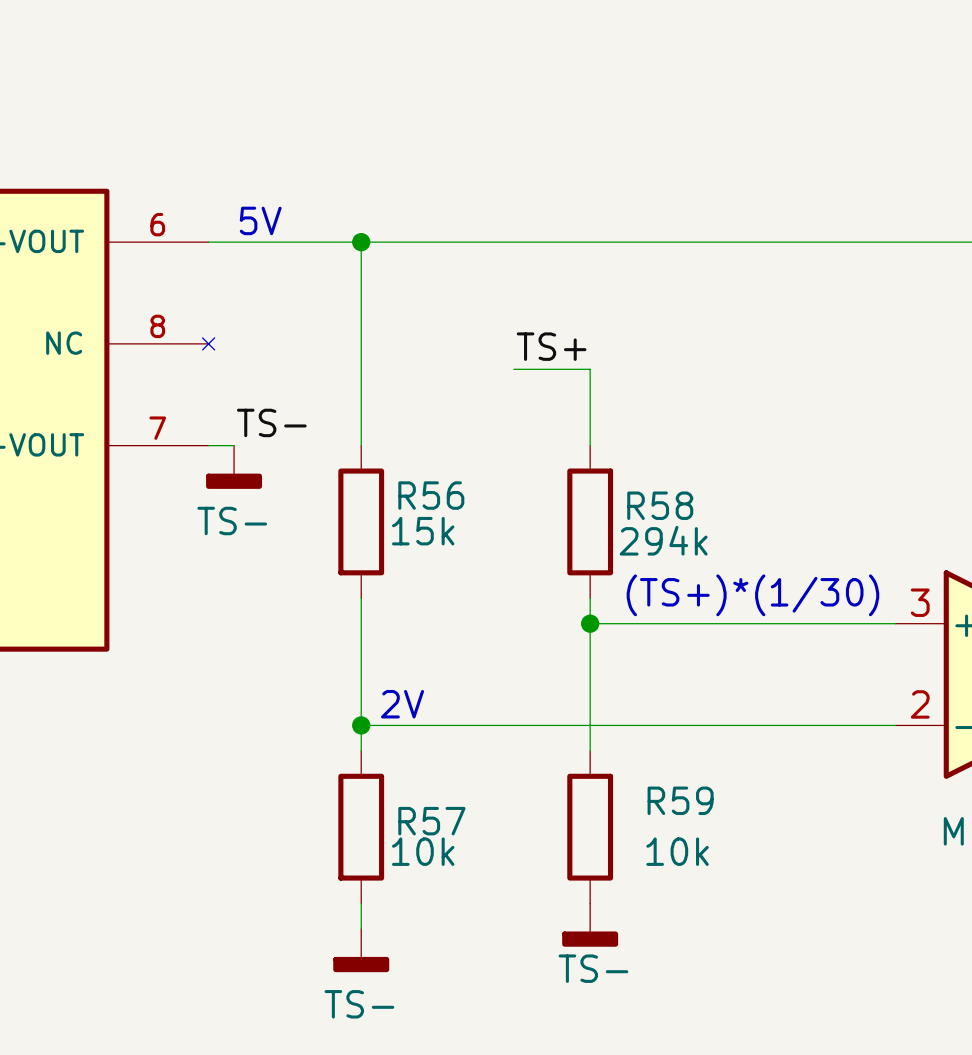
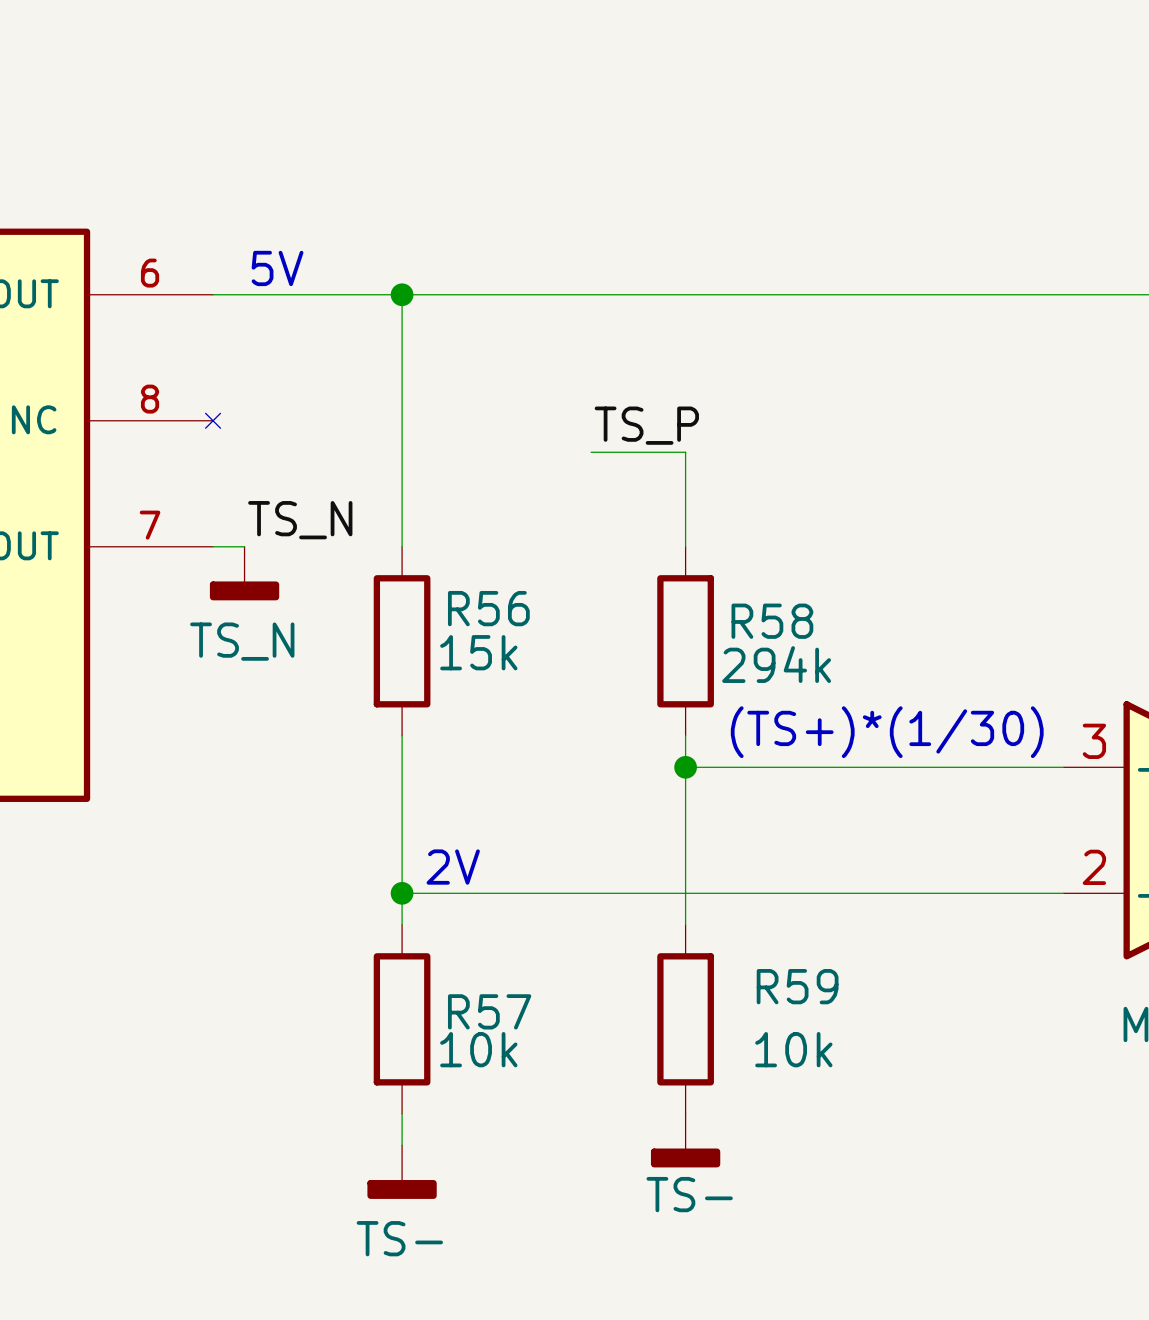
label: TS+ (551, 346) -> TS_P (646, 425)
label: TS- (271, 422) -> TS_N (300, 520)
power symbol: TS- (234, 467) -> TS_N (244, 573)

